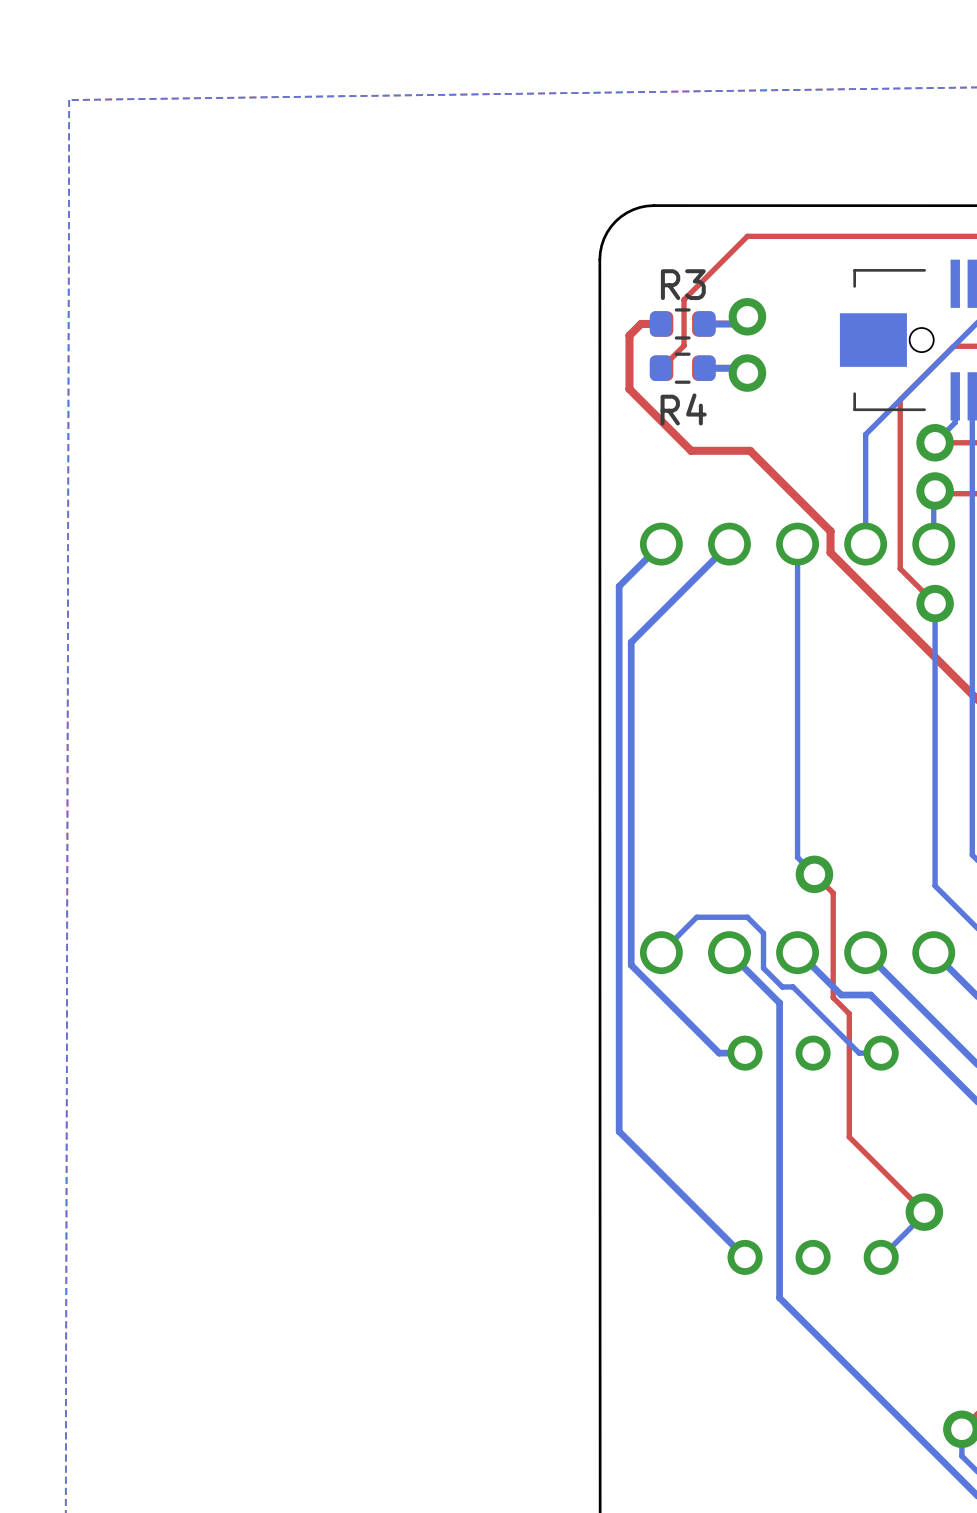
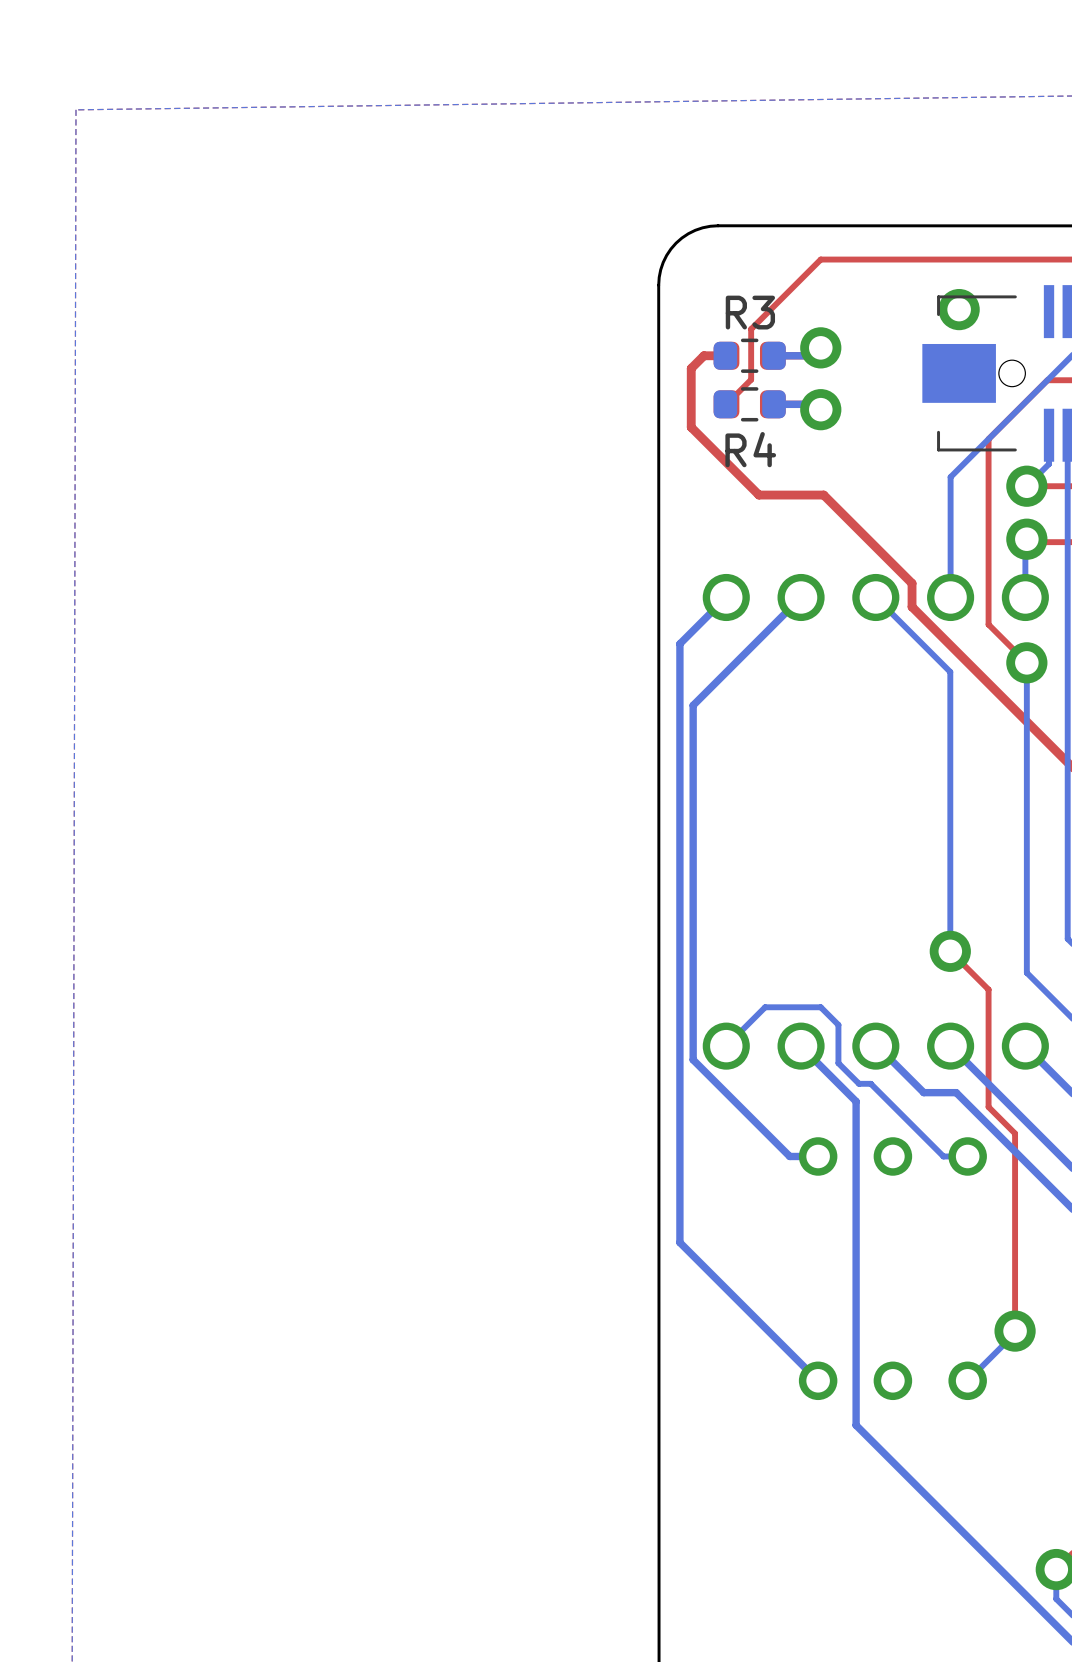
via: none -> (959, 309)
bottom track: (797, 544) (797, 857) (814, 874) -> (875, 597) (950, 671) (950, 951)
top track: (814, 874) (833, 893) (833, 997) (849, 1013) (849, 1137) (924, 1212) -> (950, 951) (988, 989) (988, 1107) (1015, 1133) (1015, 1331)
via position: (814, 874) -> (950, 951)

